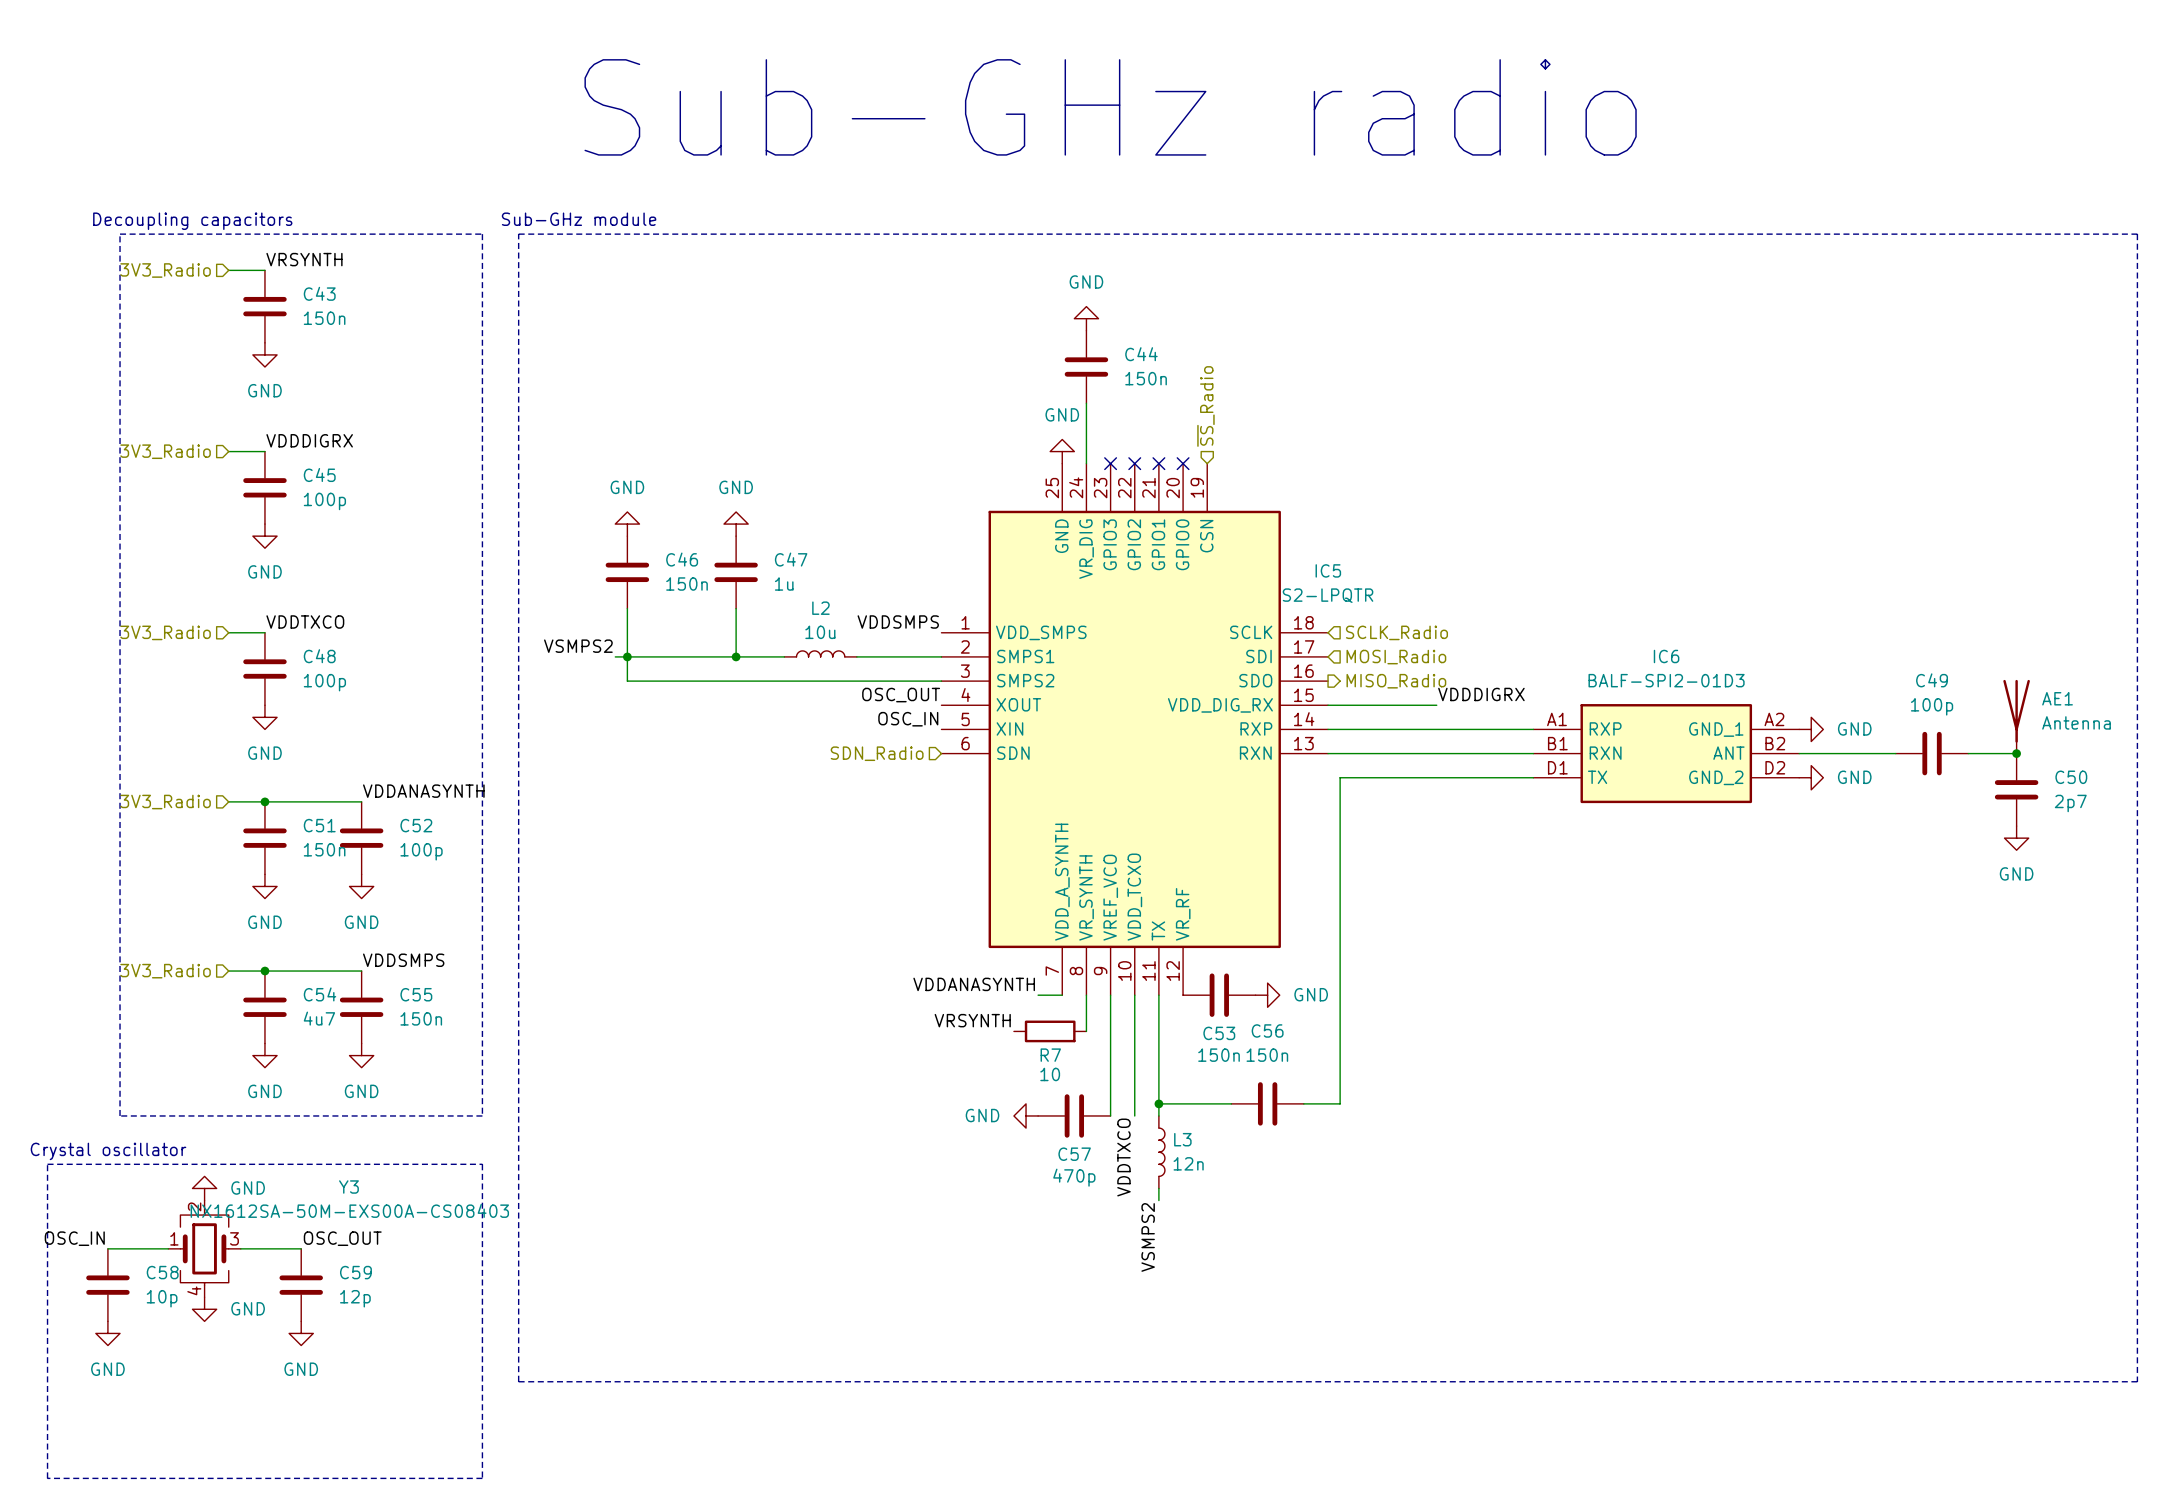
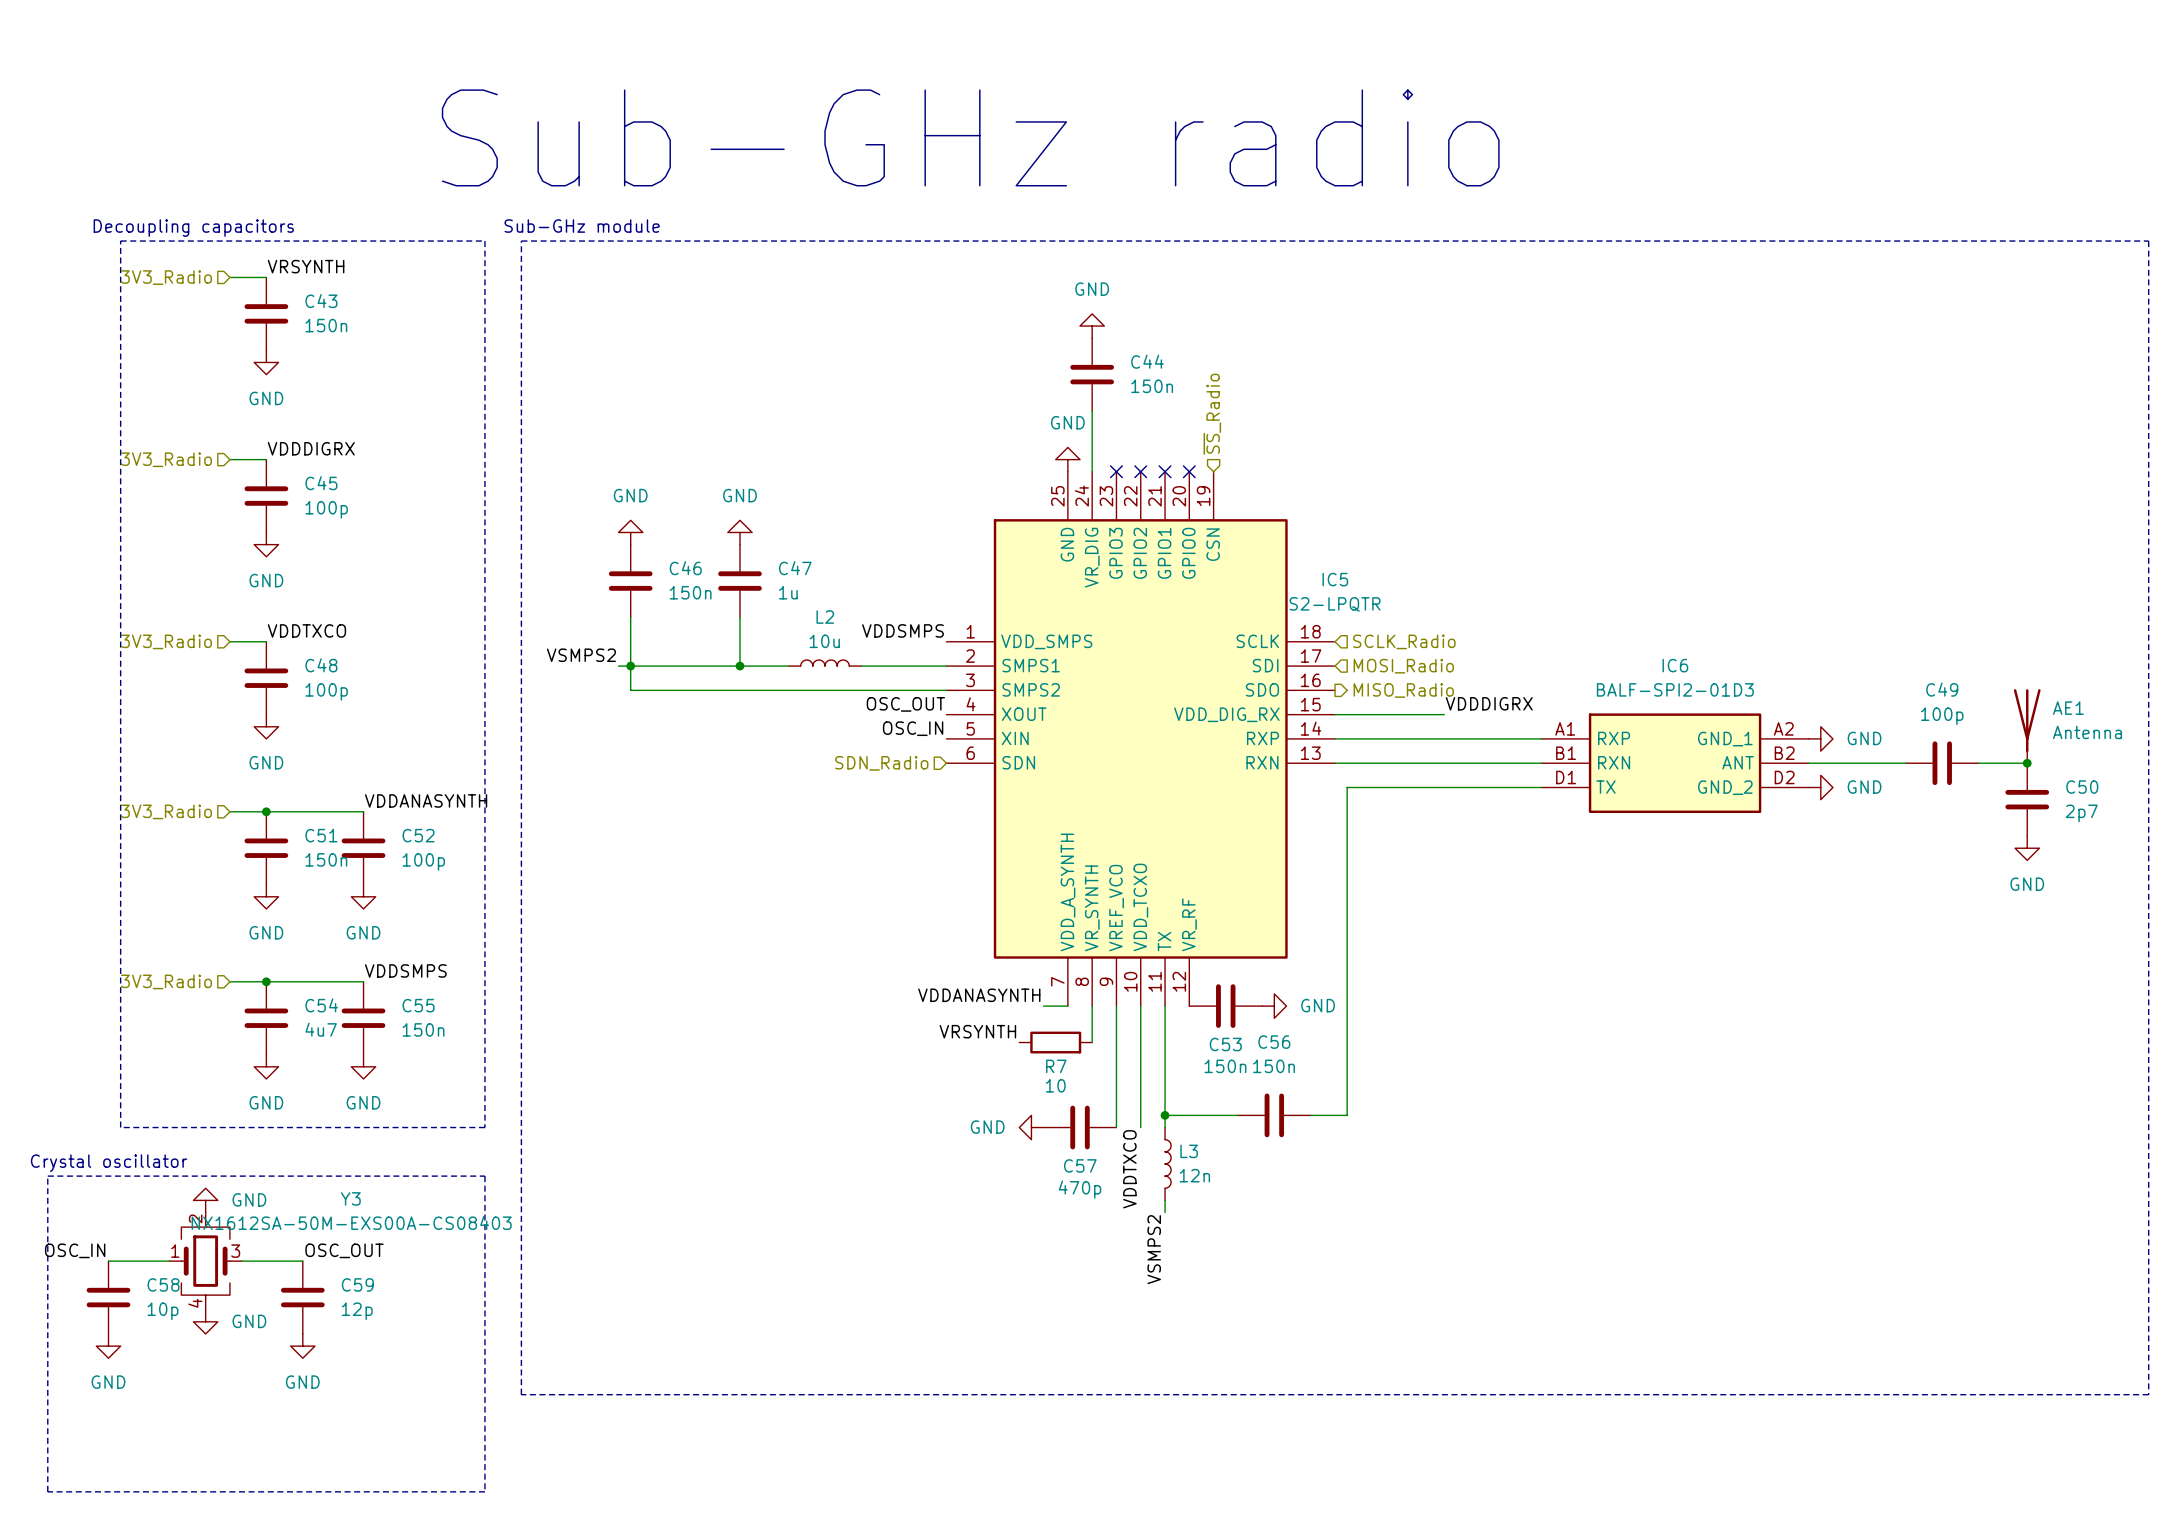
text position: Sub-GHz radio (1110, 107) -> Sub-GHz radio (970, 137)

